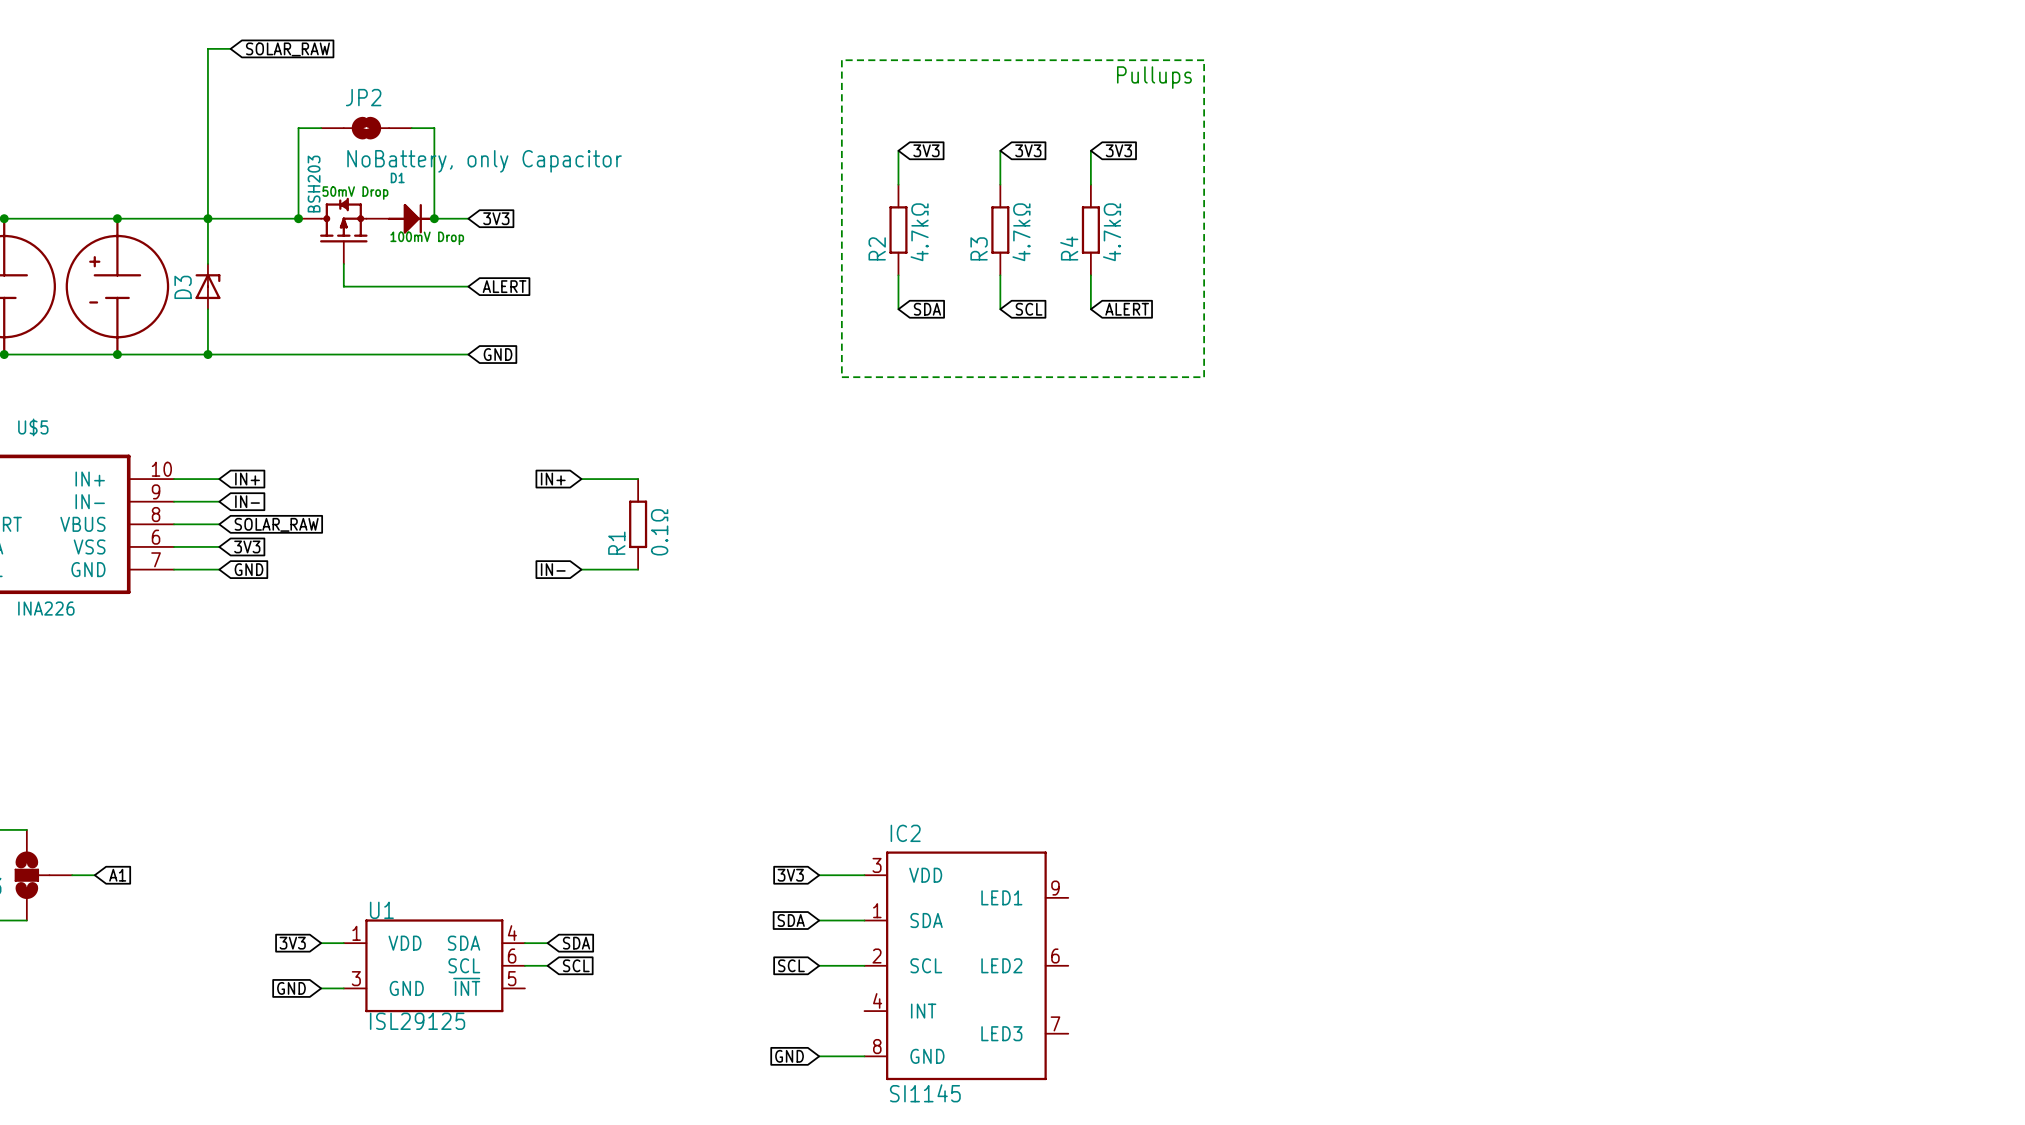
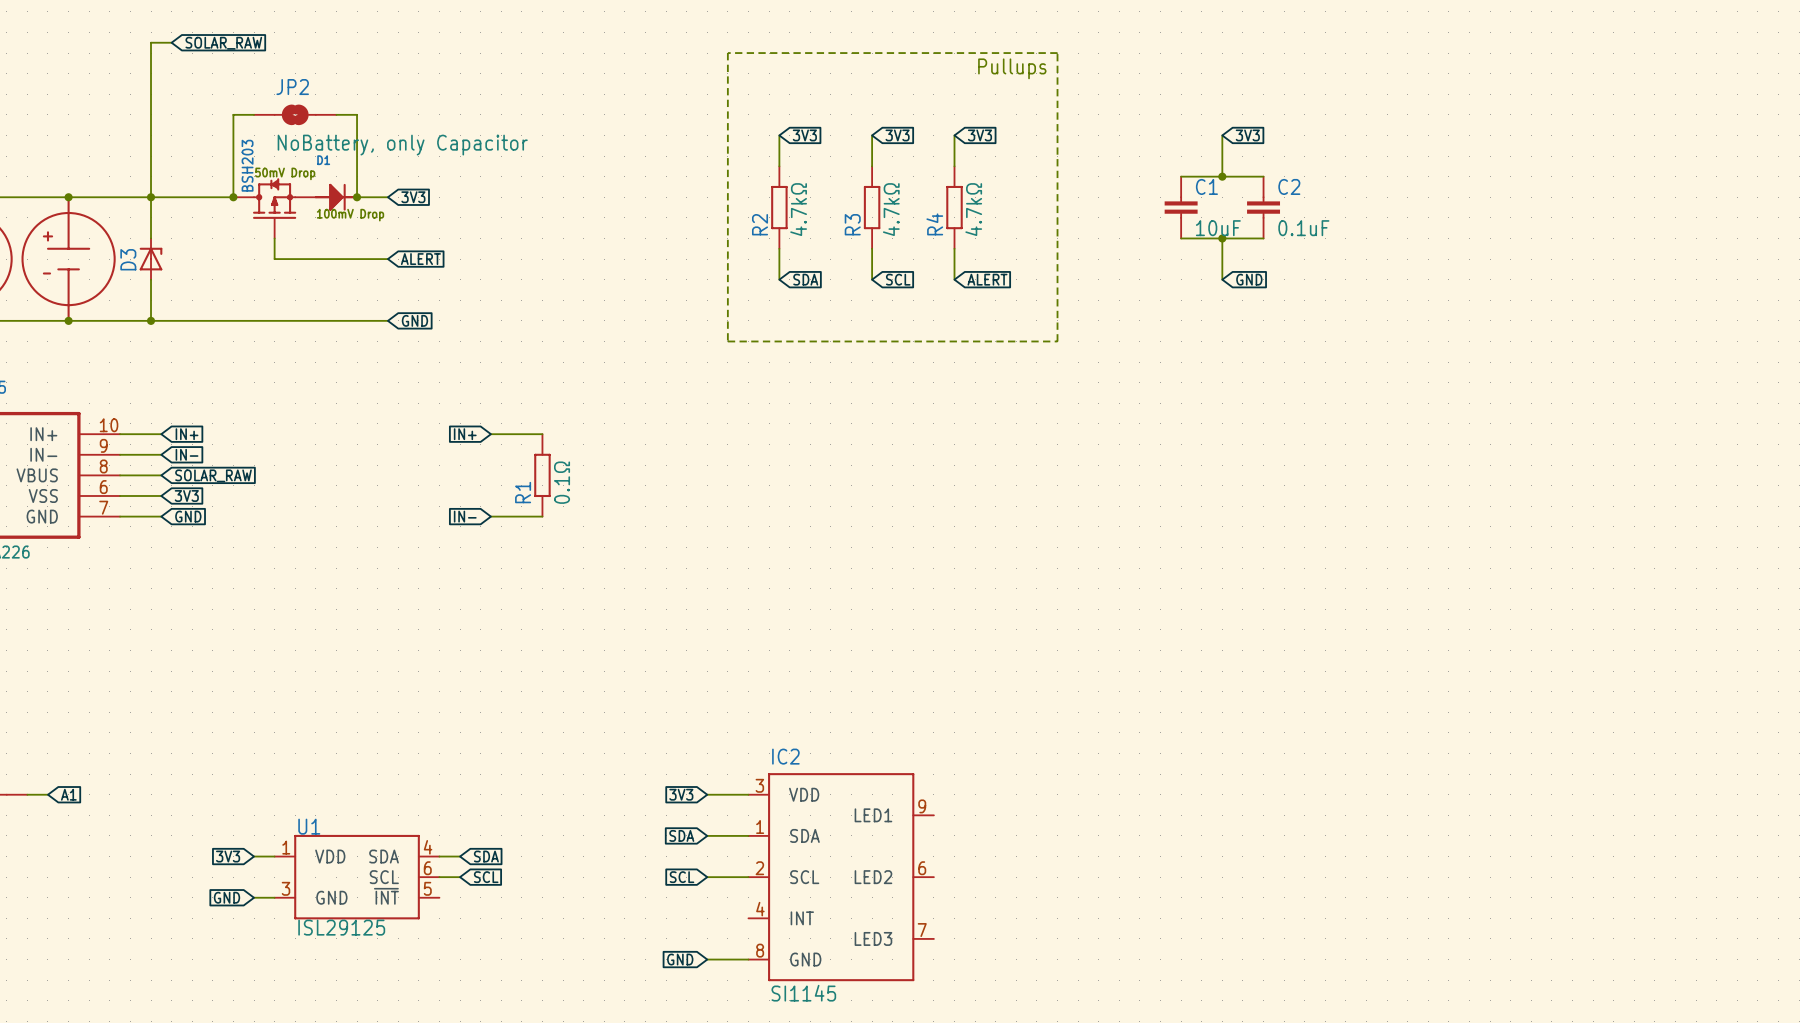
wire: none -> (1222, 135) (1222, 176)
global label: none -> 3V3 (1247, 135)
wire: none -> (1181, 176) (1263, 176)
junction: none -> (1222, 176)
C1: none -> 10uF (1181, 207)
C2: none -> 0.1uF (1263, 207)
wire: none -> (1181, 238) (1263, 238)
wire: none -> (1222, 238) (1222, 279)
junction: none -> (1222, 238)
global label: none -> GND (1249, 279)

